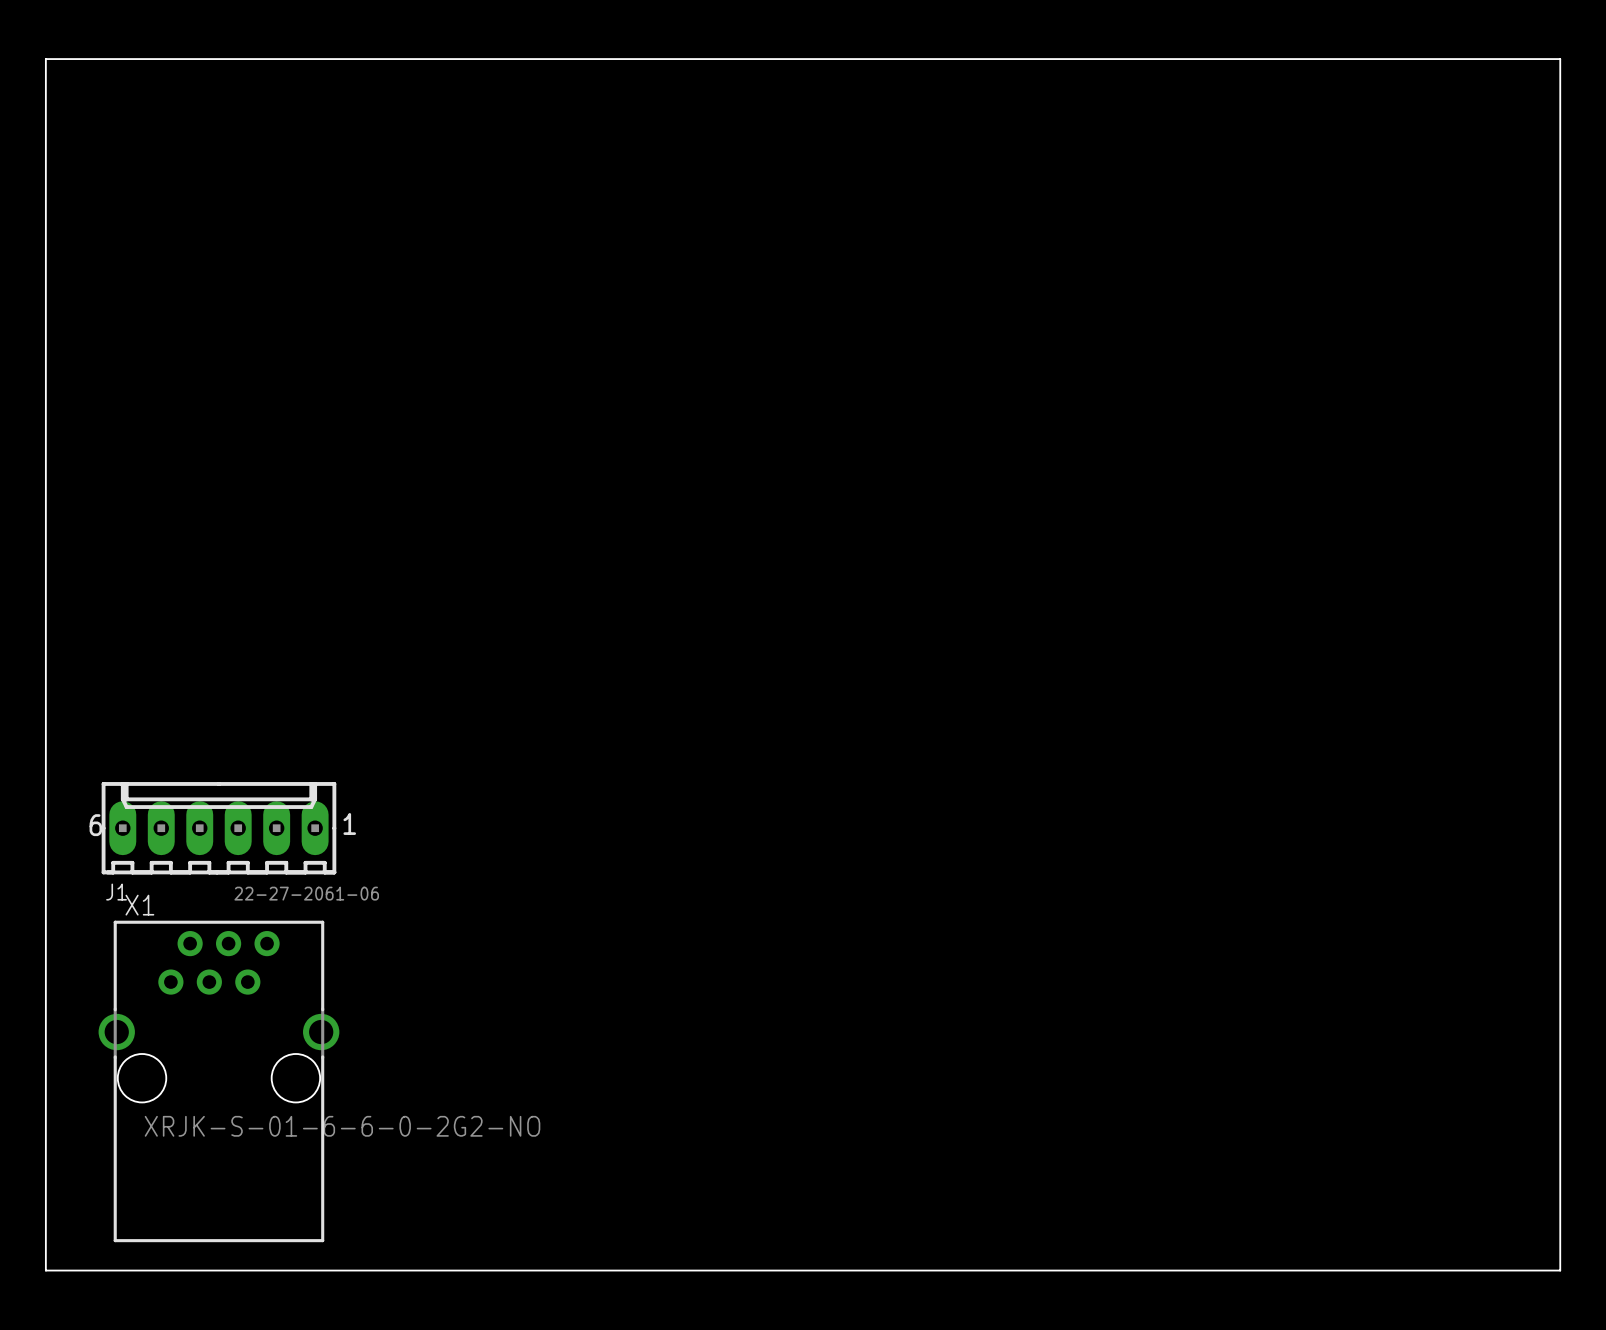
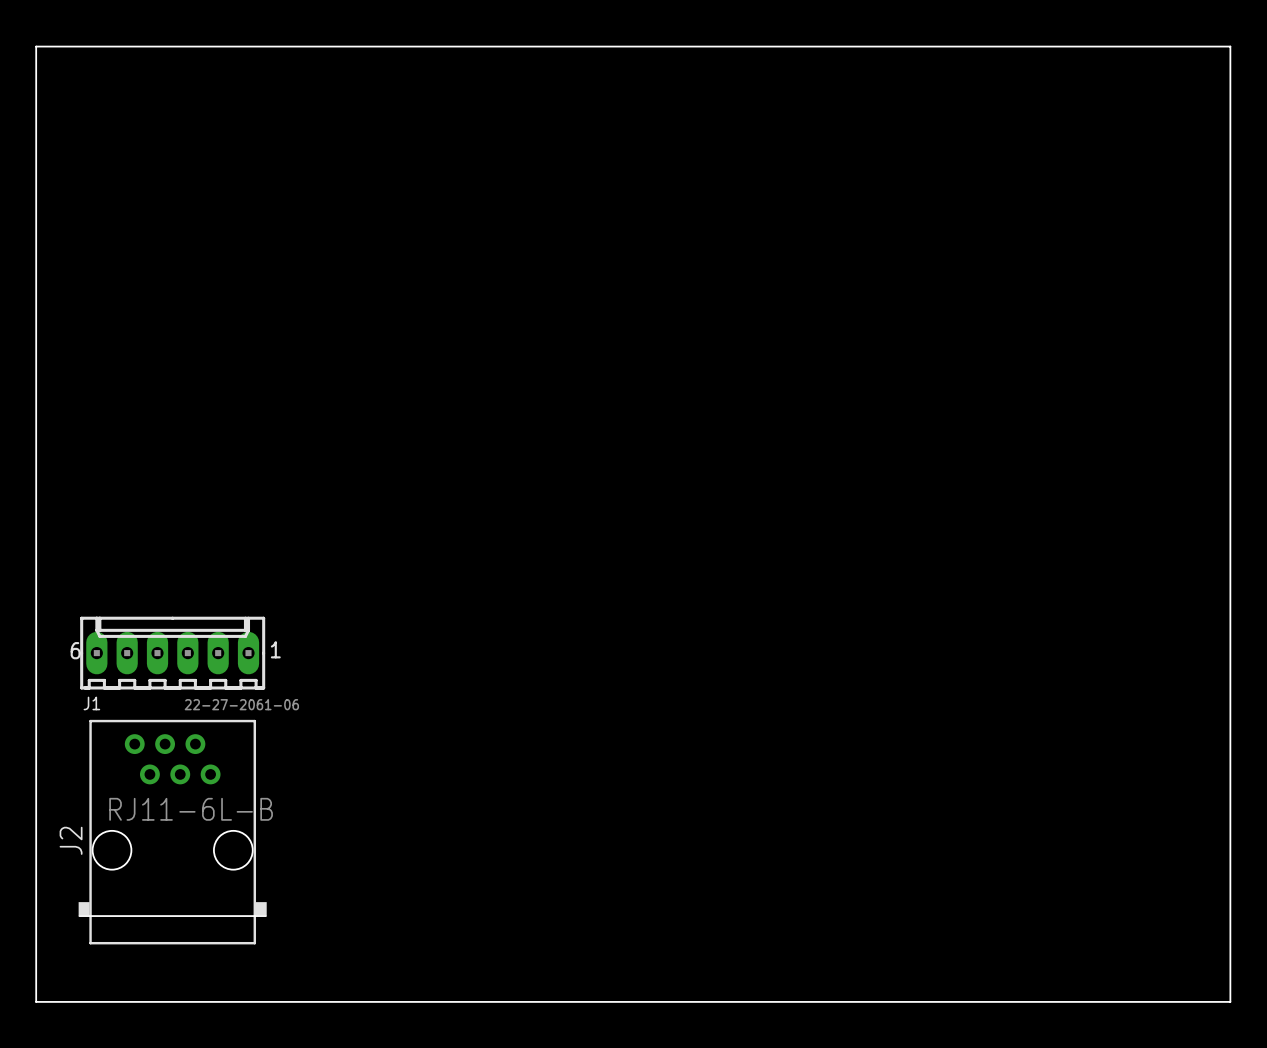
J2: none -> RJ11-6L-B (172, 832)
X1: XRJK-S-01-6-6-0-2G2-NO (218, 1081) -> none

